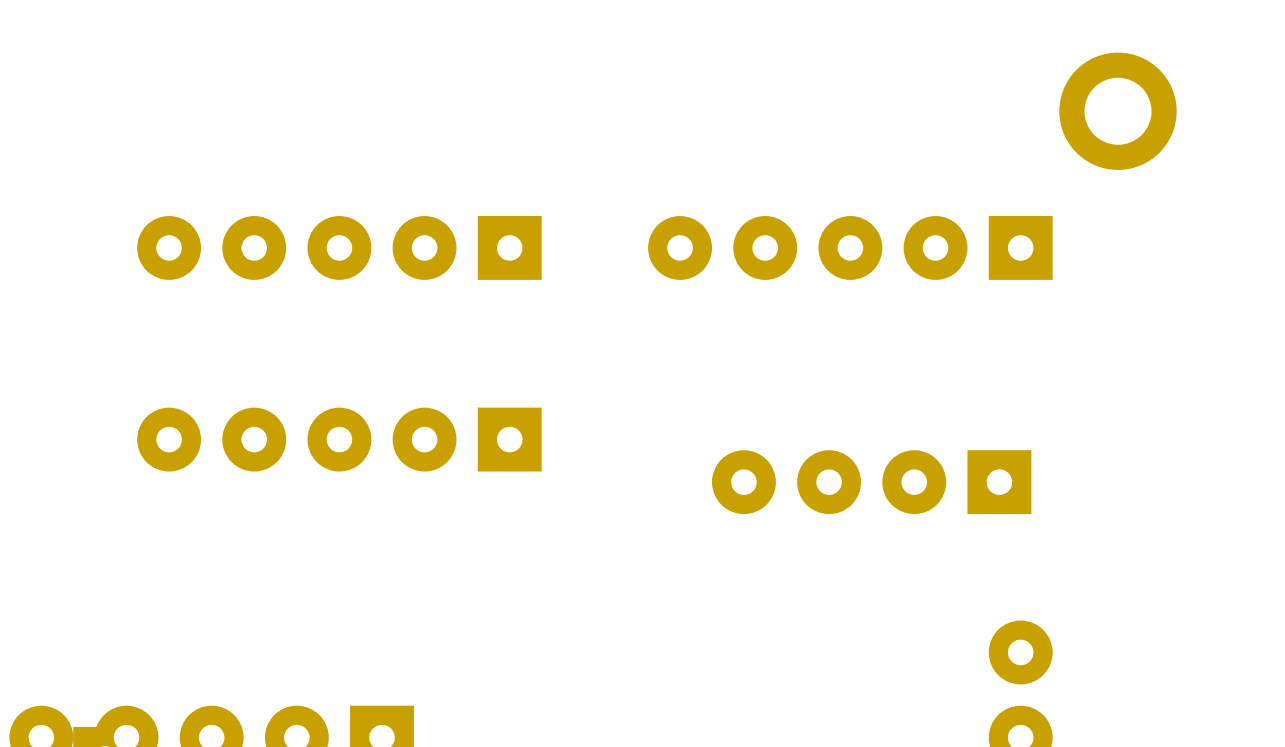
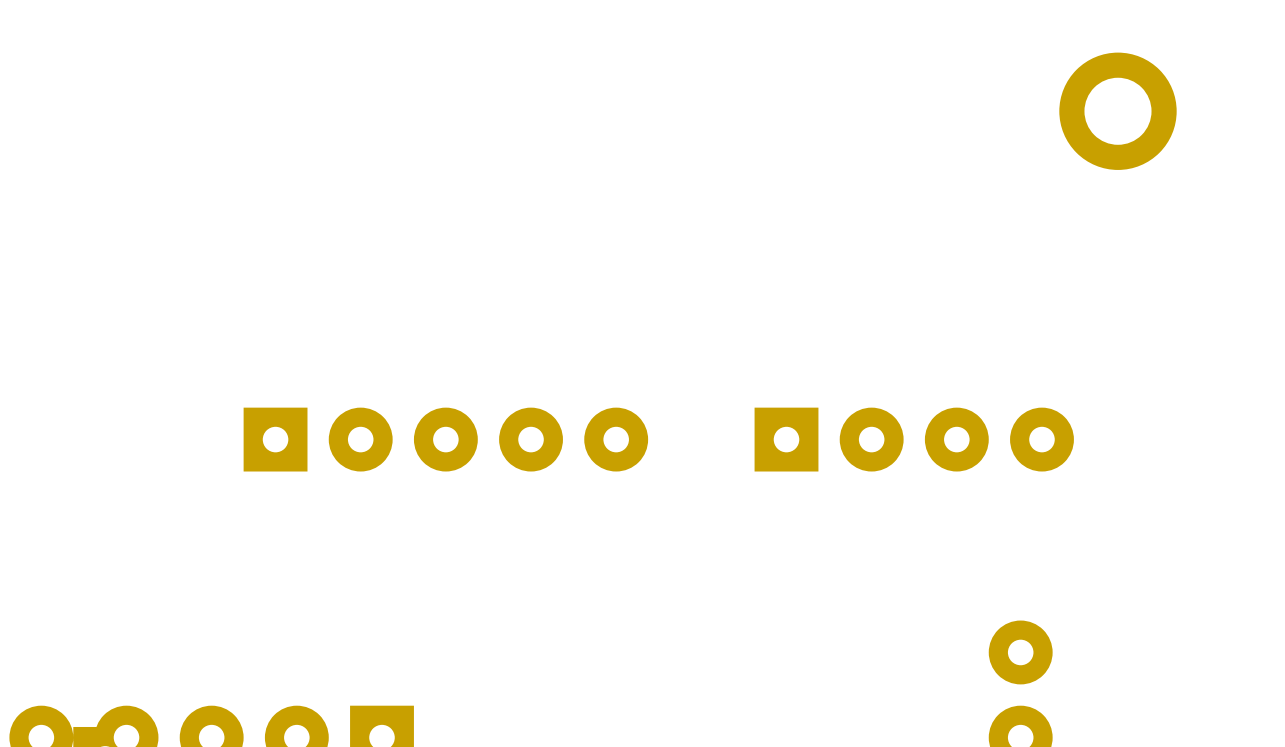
part: (339, 247) -> none
part: (850, 247) -> none
part rotation: 0° (339, 439) -> 180° (445, 439)
part rotation: 0° (871, 482) -> 180° (914, 439)

